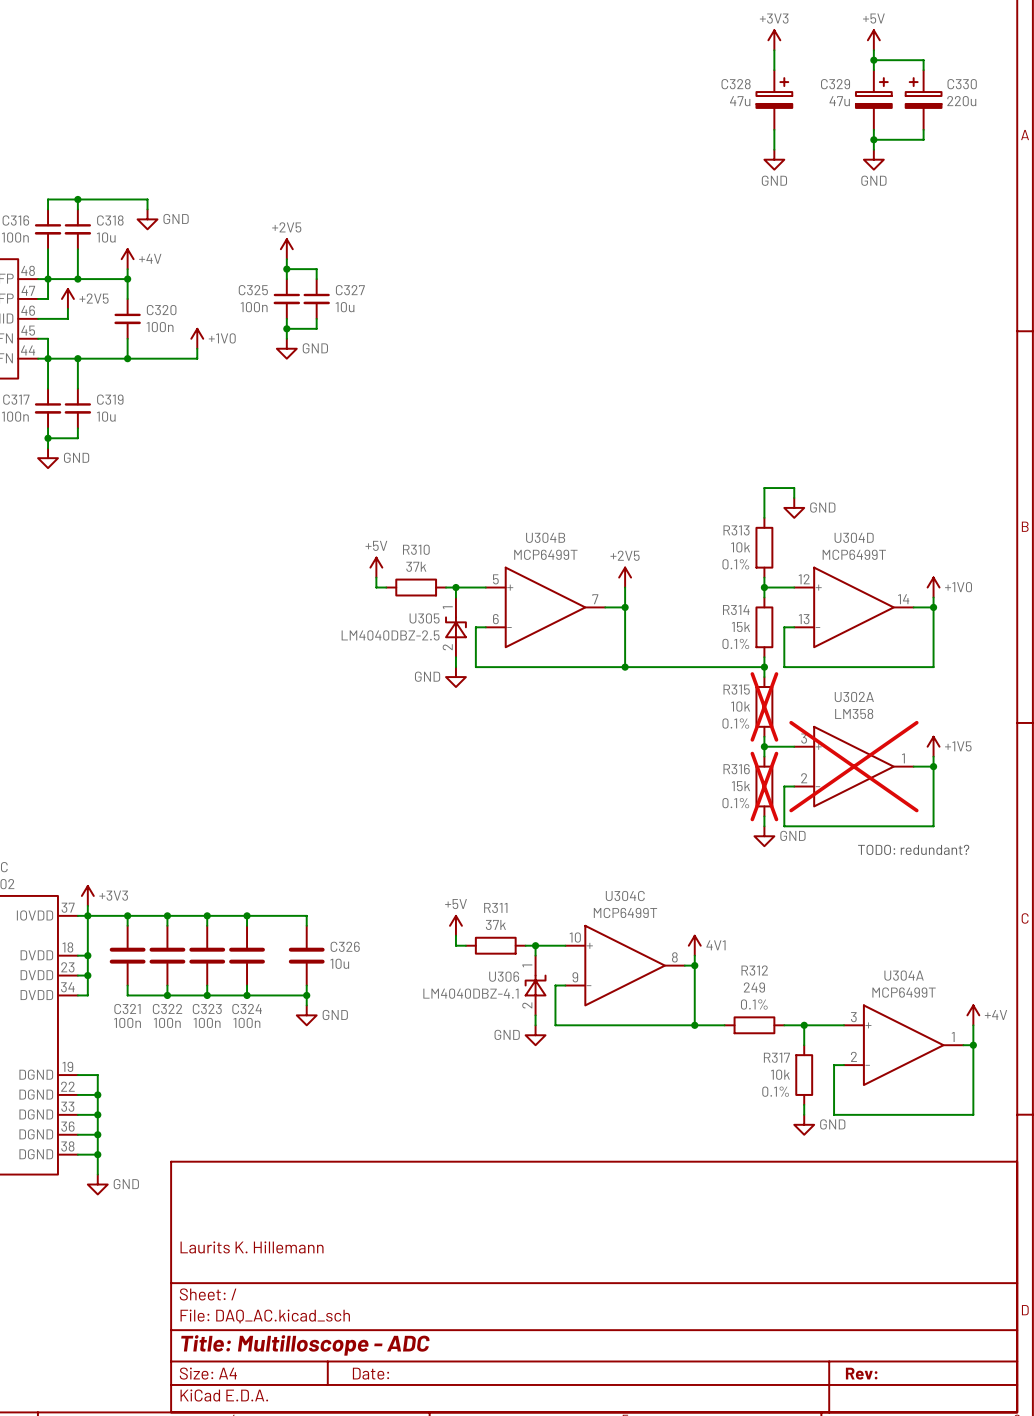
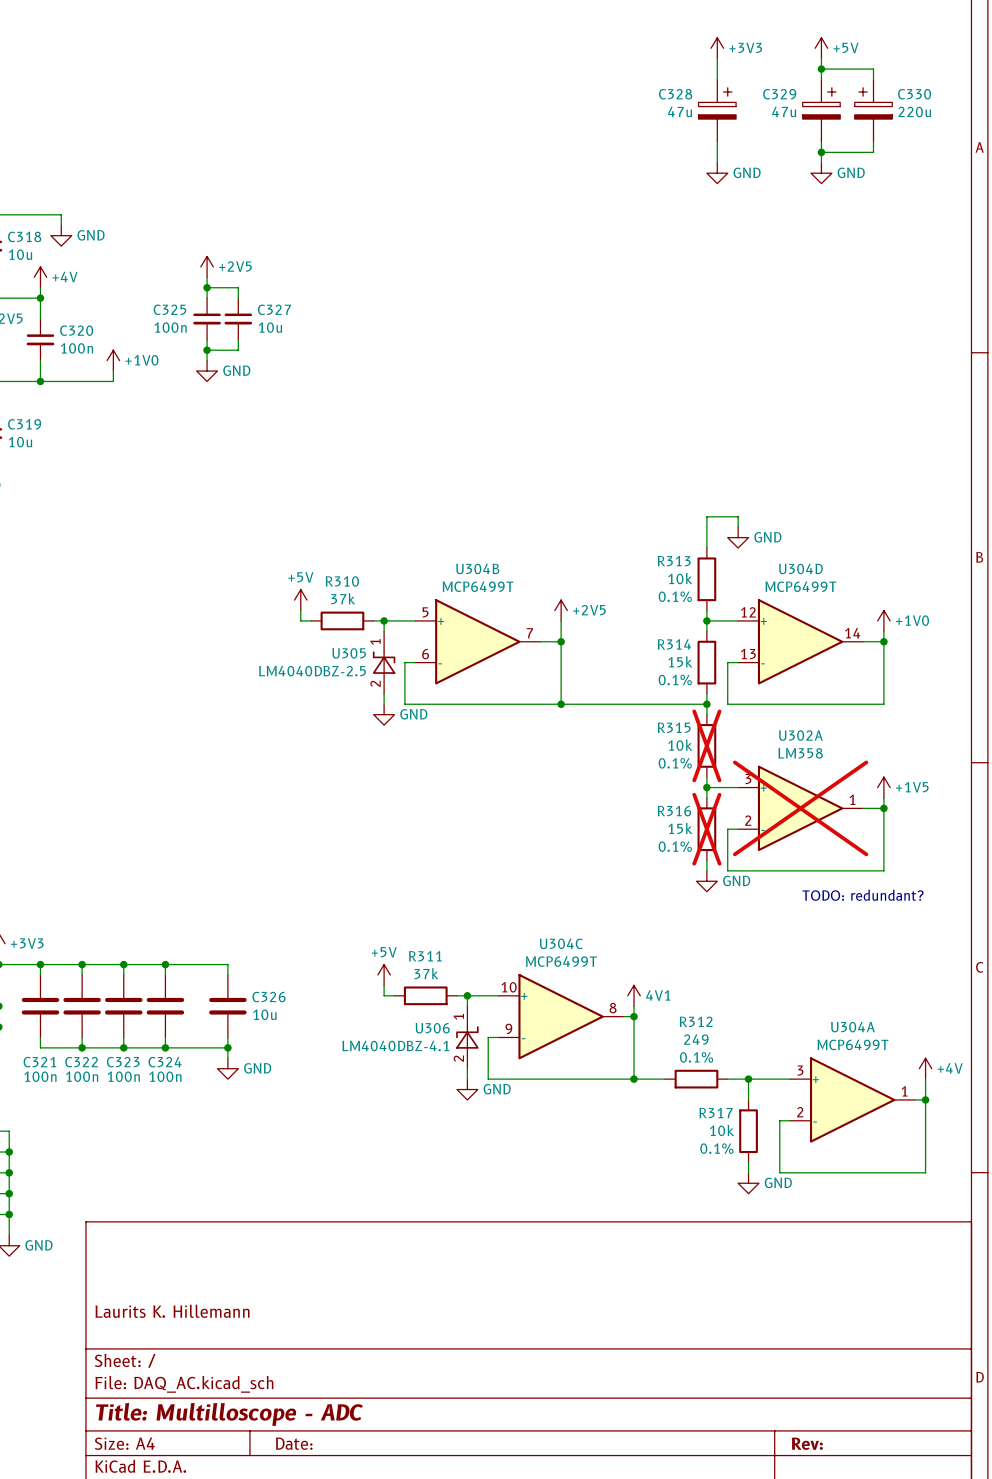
power symbol text position: +3V3 (774, 18) -> +3V3 (745, 47)
power symbol text position: +5V (873, 18) -> +5V (846, 47)
power symbol text position: GND (774, 180) -> GND (747, 172)
power symbol text position: GND (873, 180) -> GND (851, 172)
power symbol text position: +2V5 (286, 227) -> +2V5 (235, 266)
power symbol text position: +2V5 (625, 555) -> +2V5 (589, 610)
power symbol text position: GND (427, 676) -> GND (413, 714)
power symbol text position: GND (507, 1034) -> GND (497, 1089)

